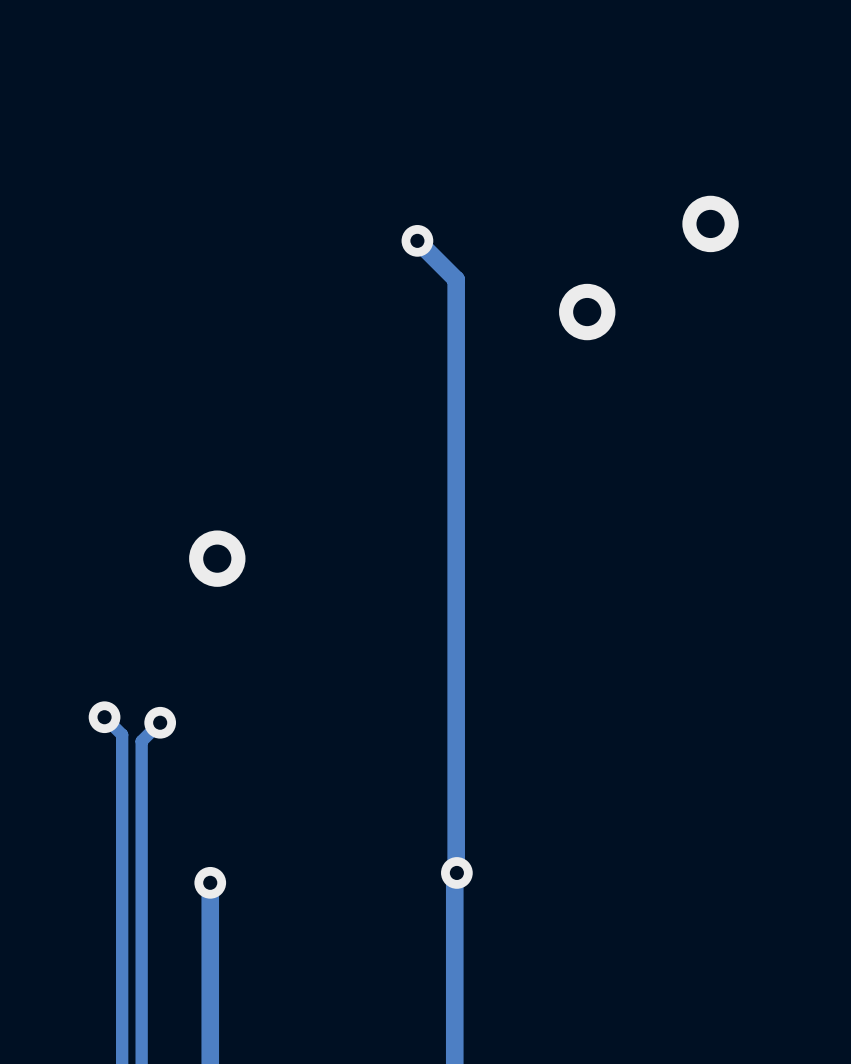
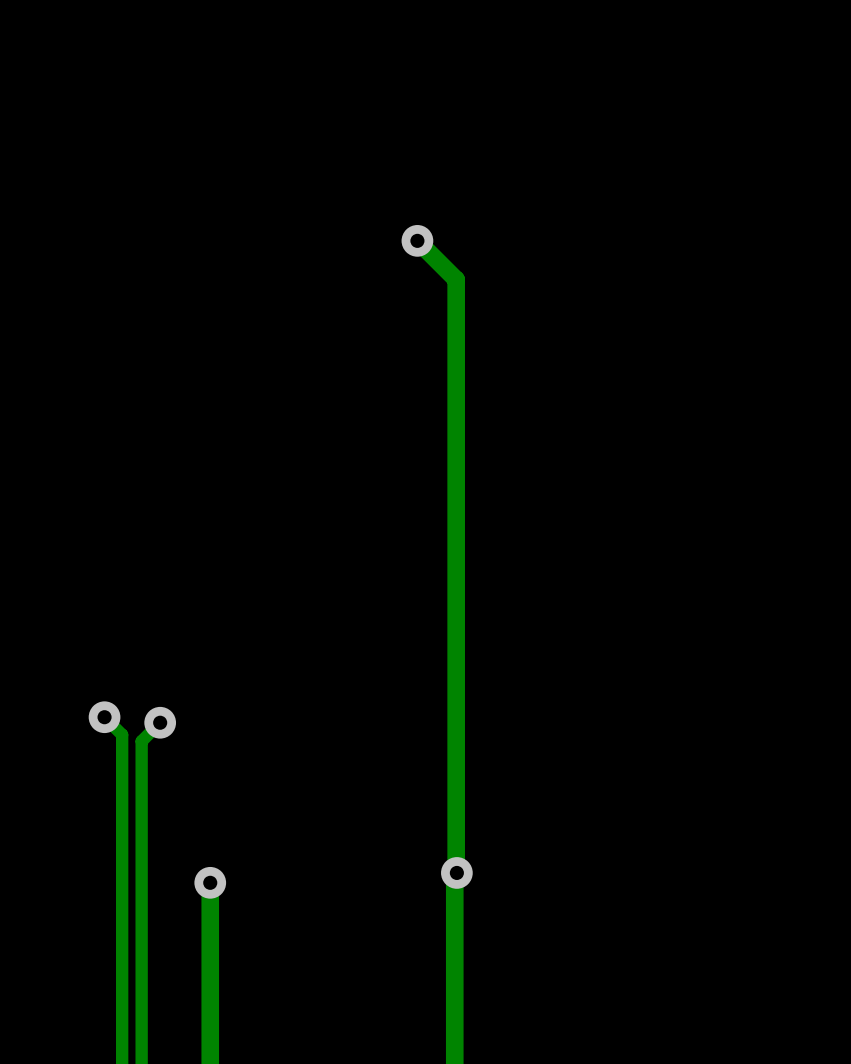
via: (710, 223) -> none
via: (587, 312) -> none
via: (217, 558) -> none

